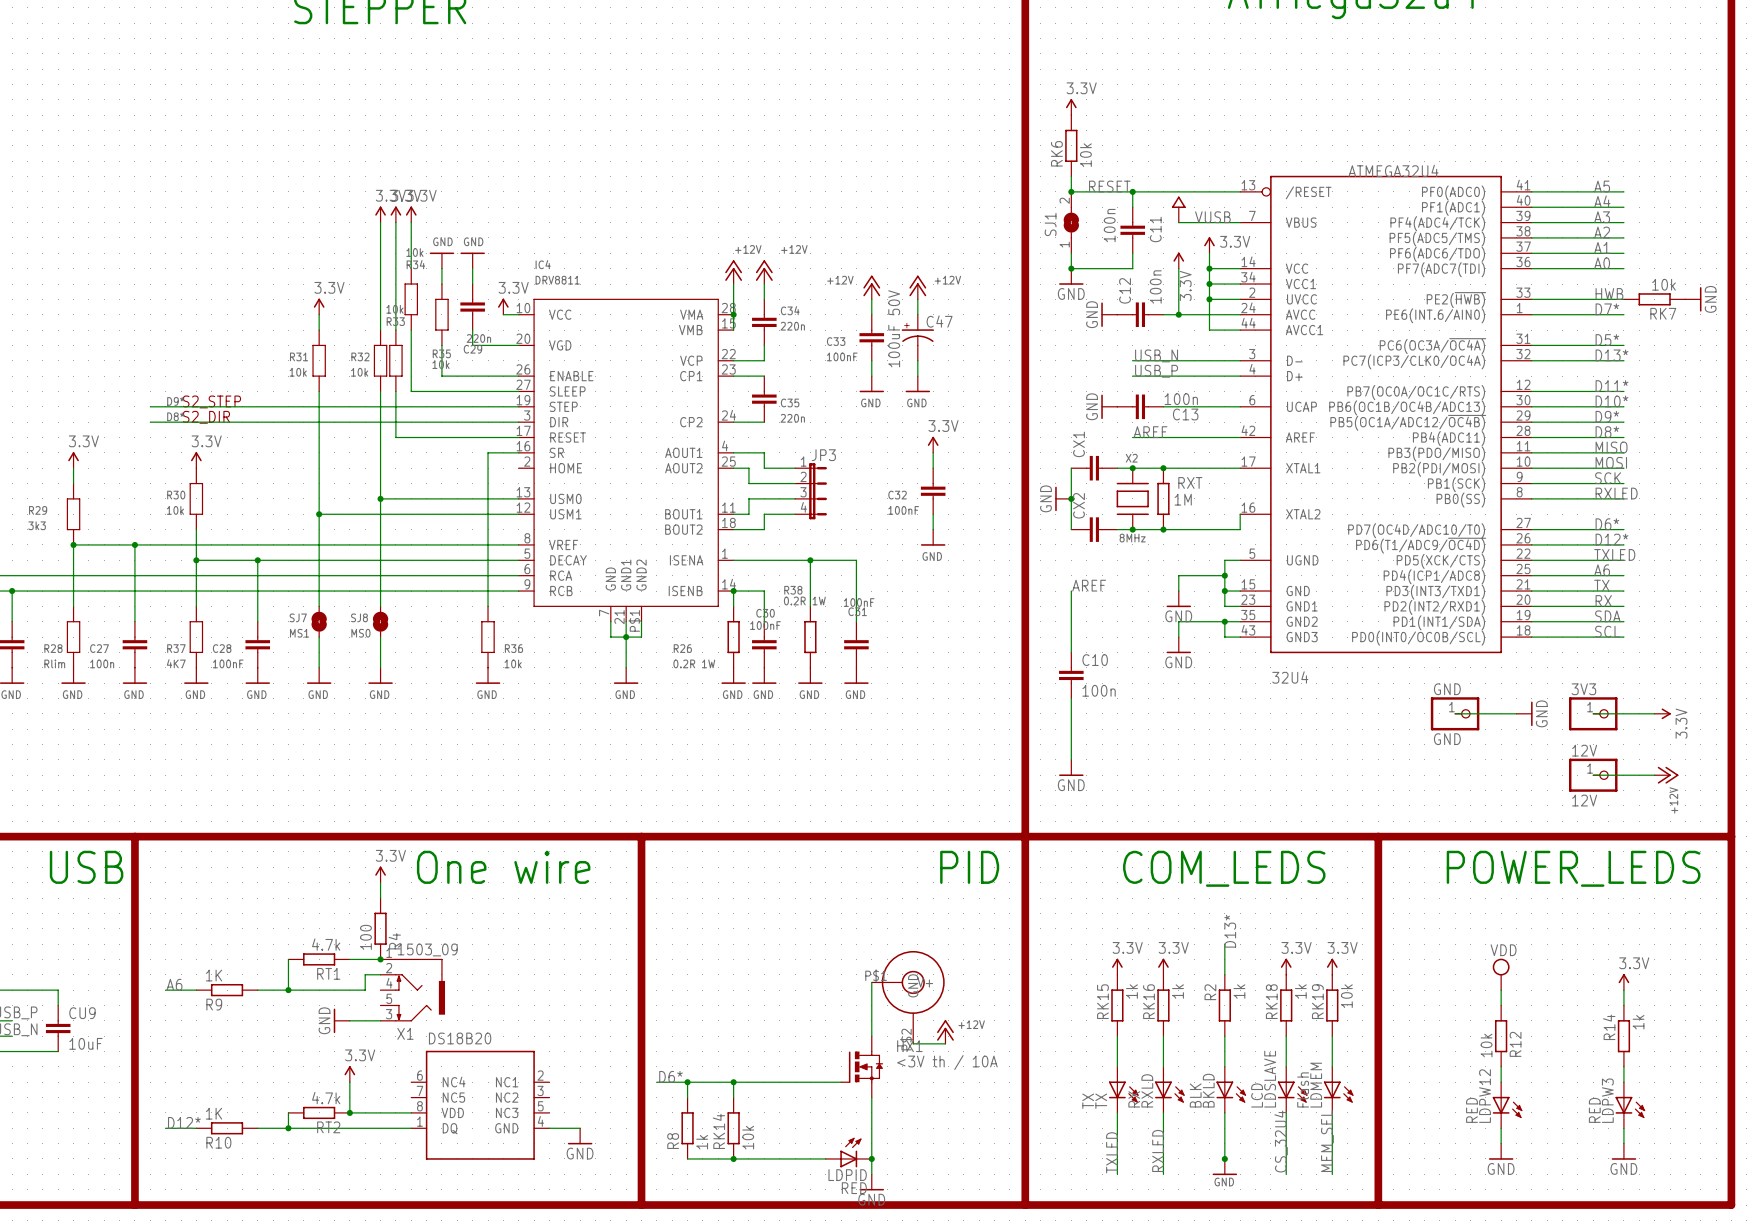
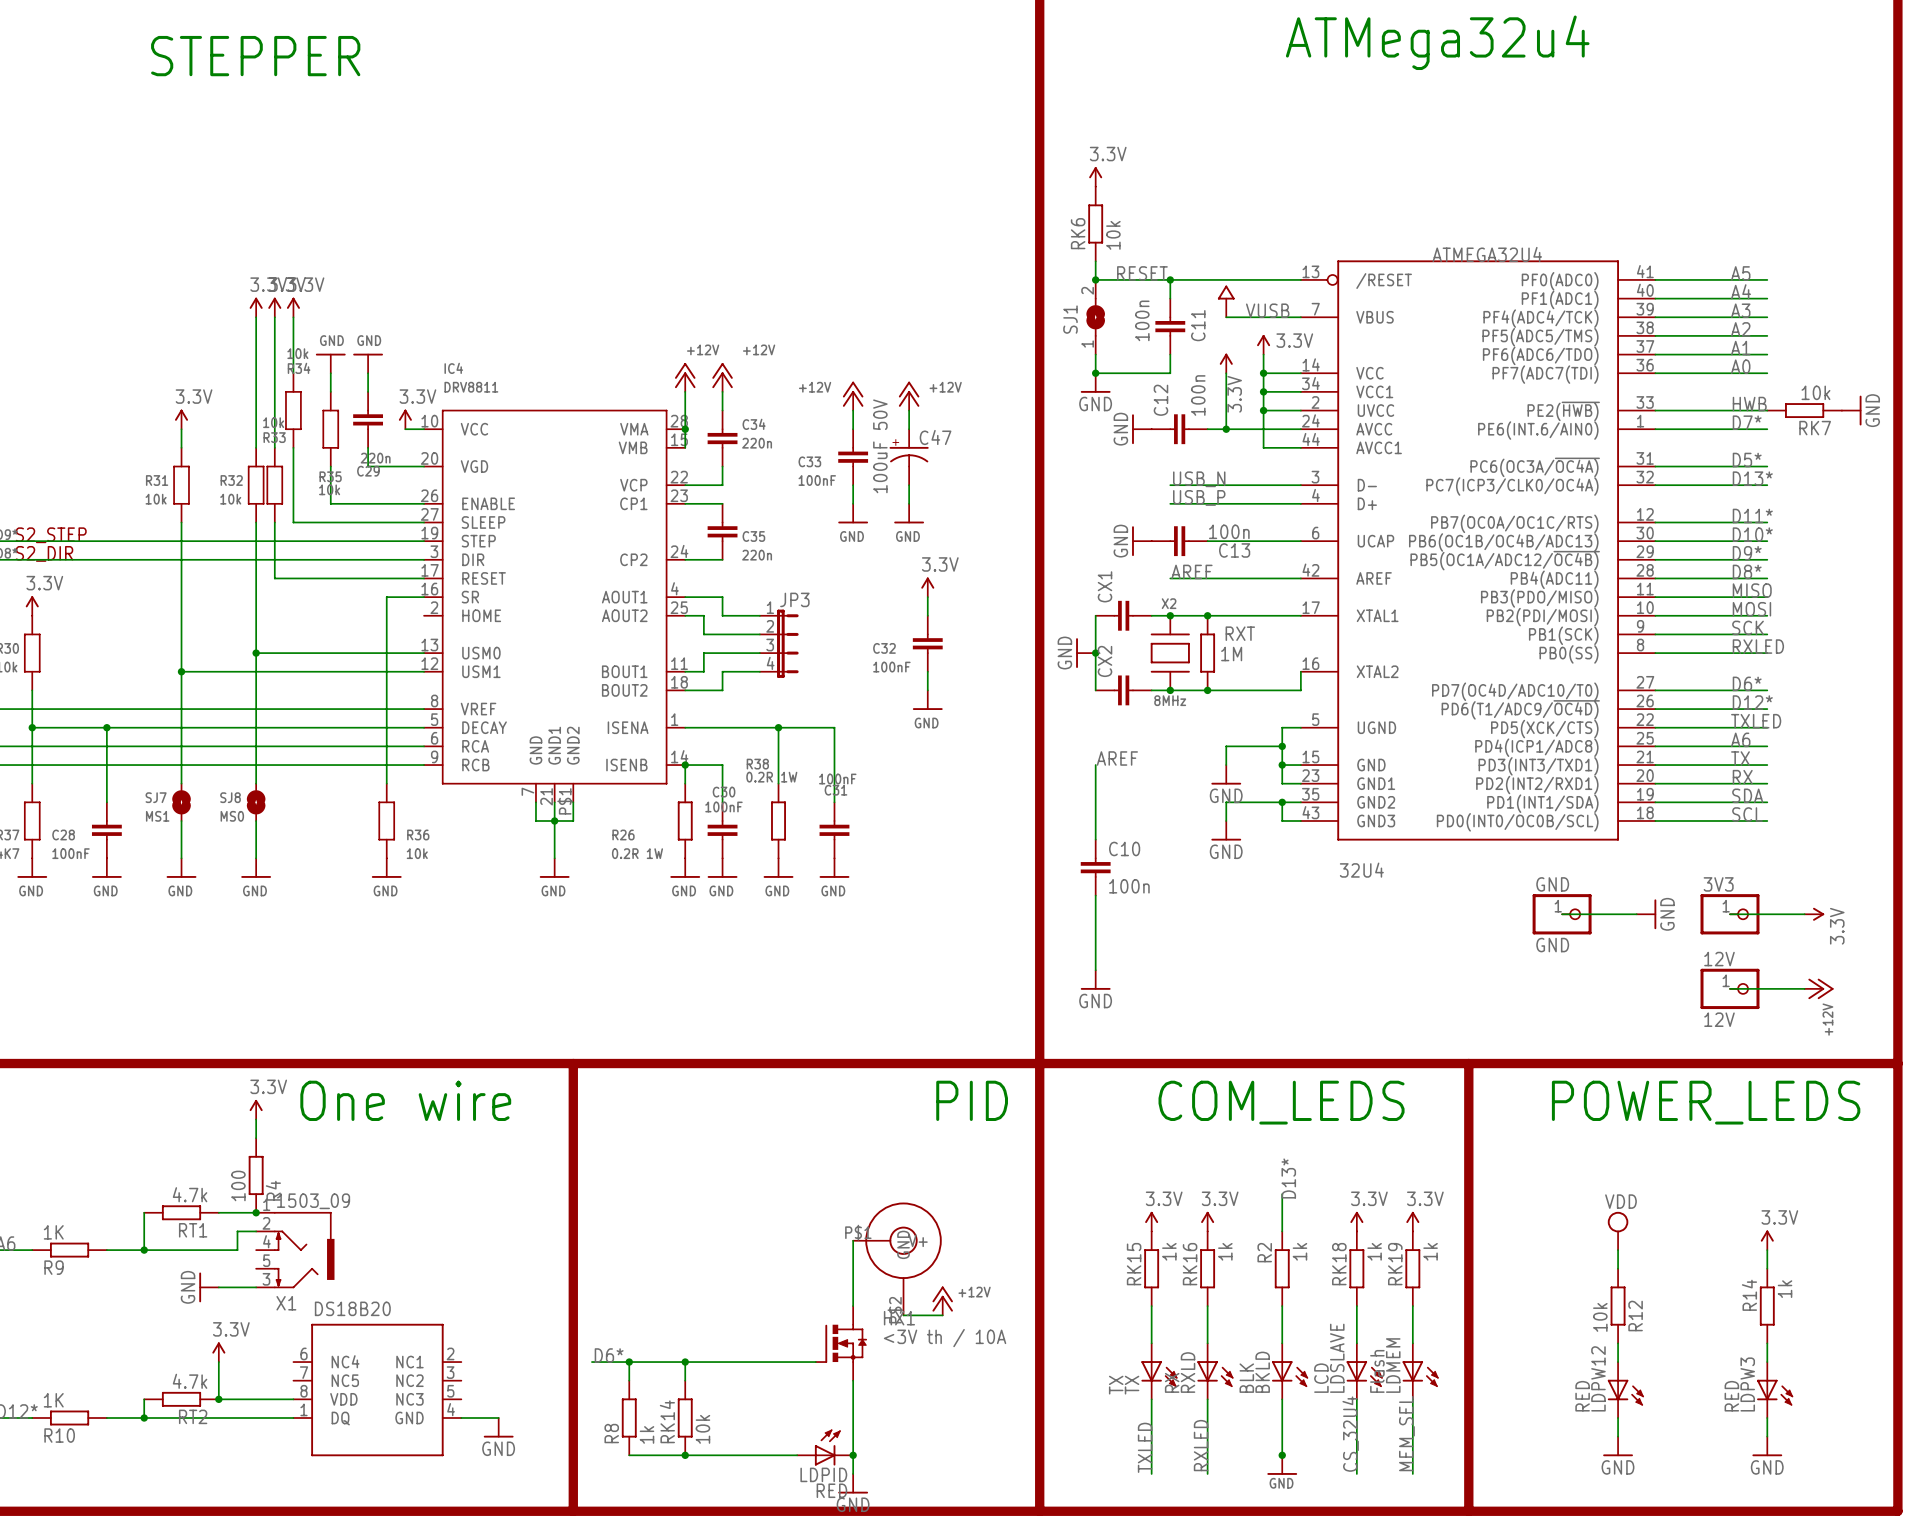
RK19 value: 10k (1346, 996) -> 1k (1430, 1251)

